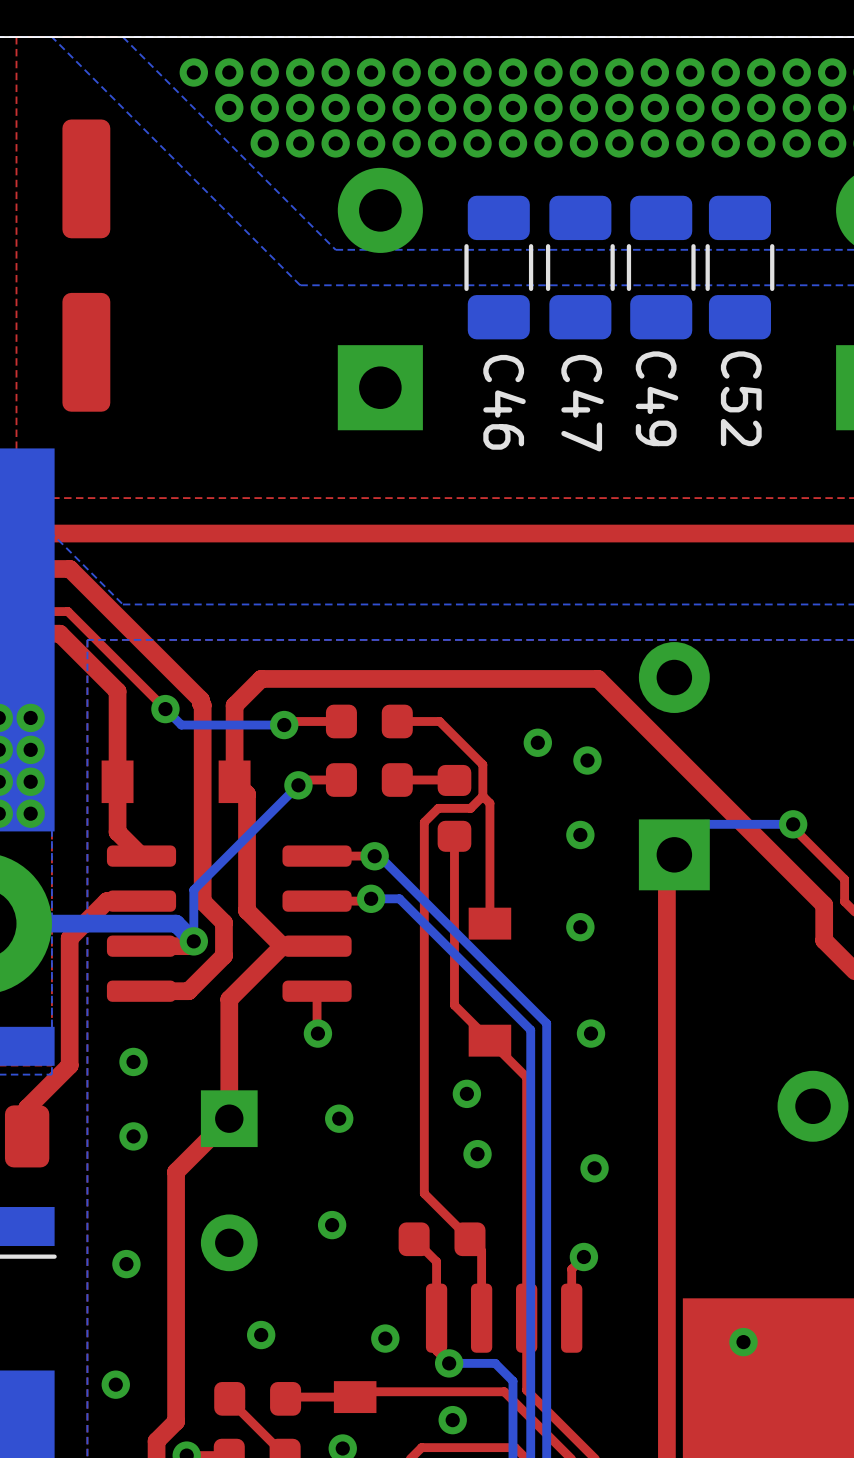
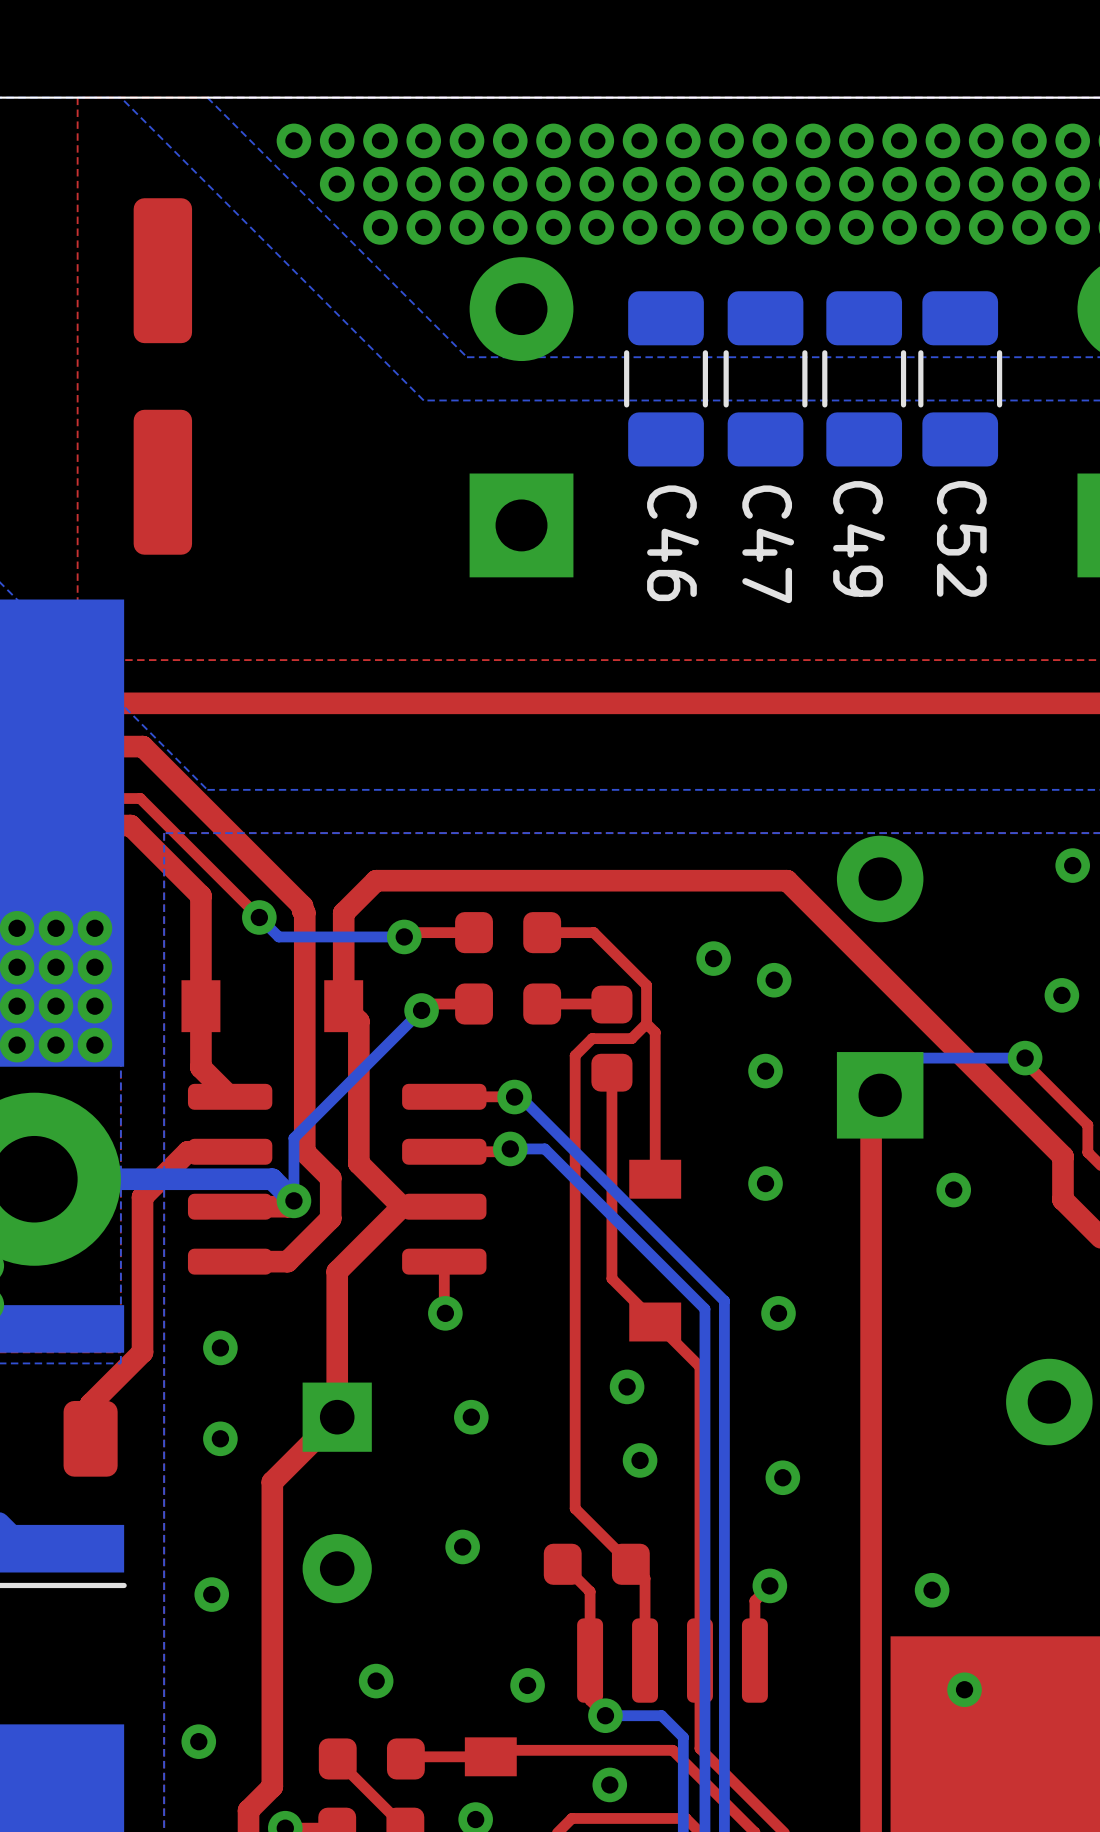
via: none -> (1072, 865)
via: none -> (1061, 995)
via: none -> (953, 1190)
via: none -> (932, 1590)

